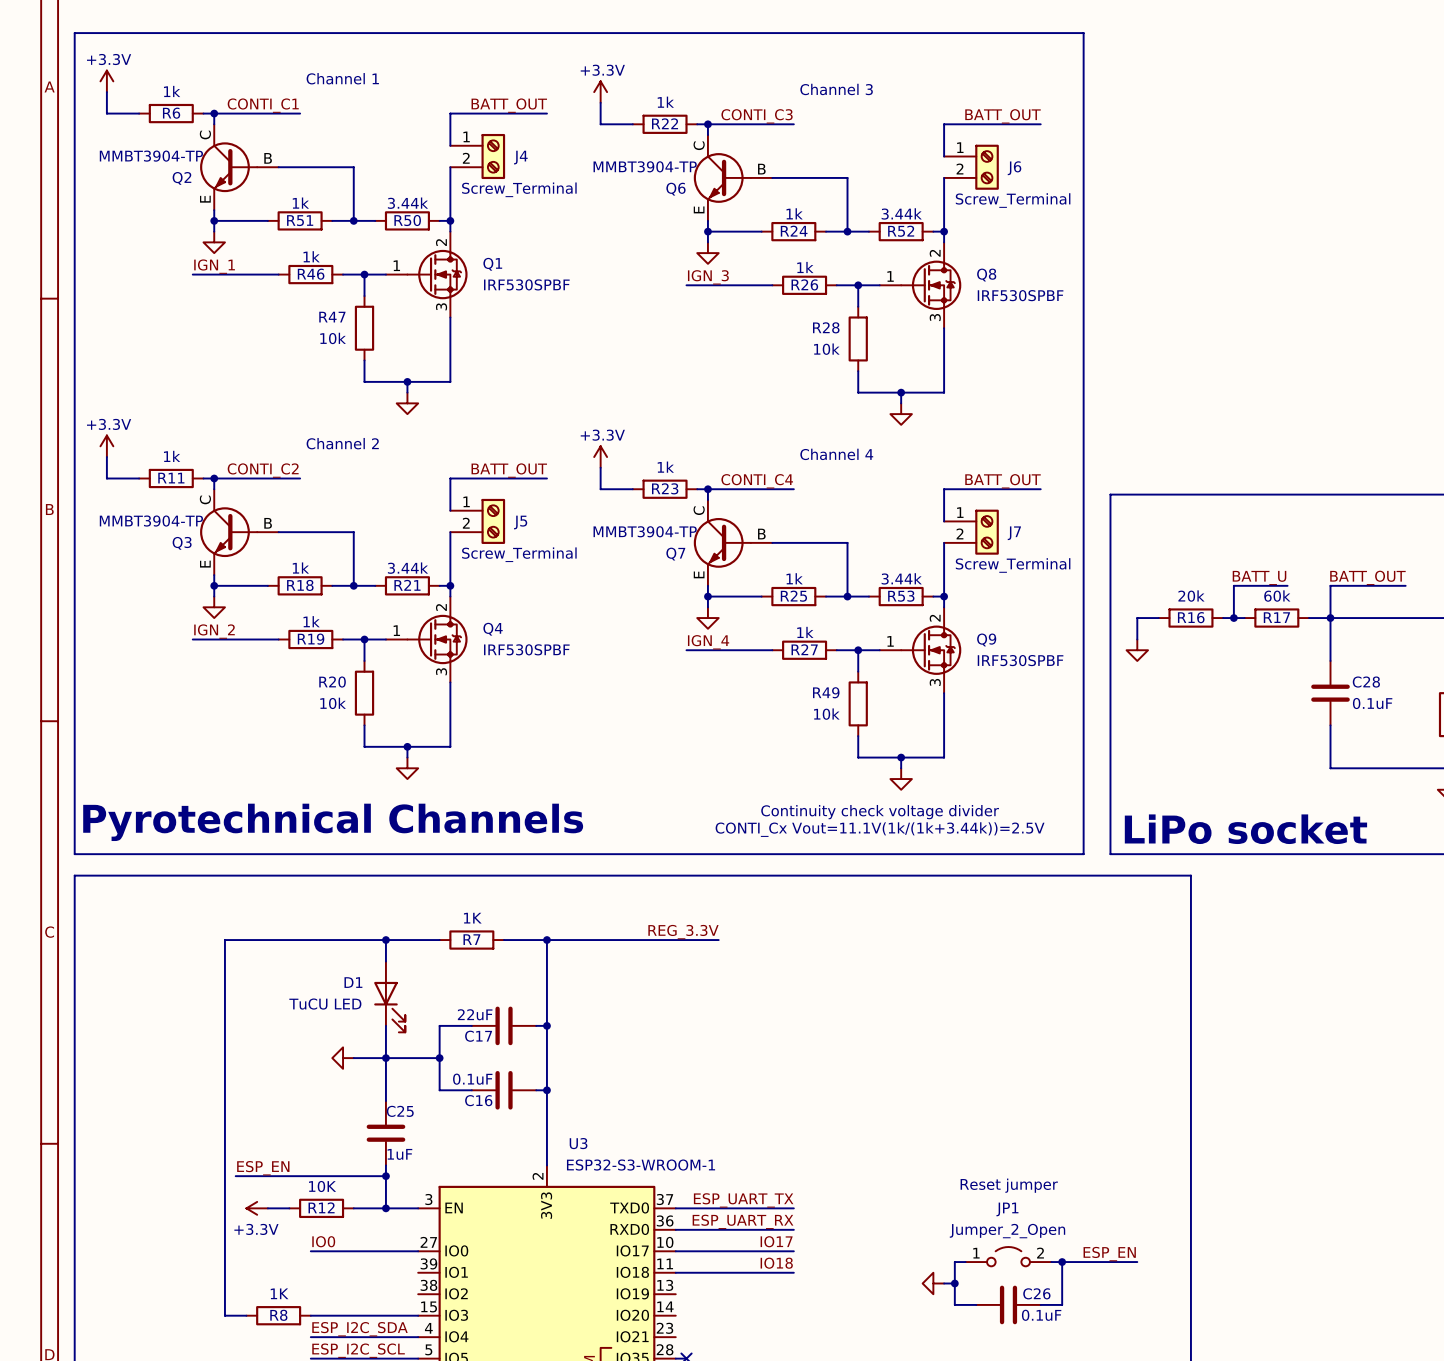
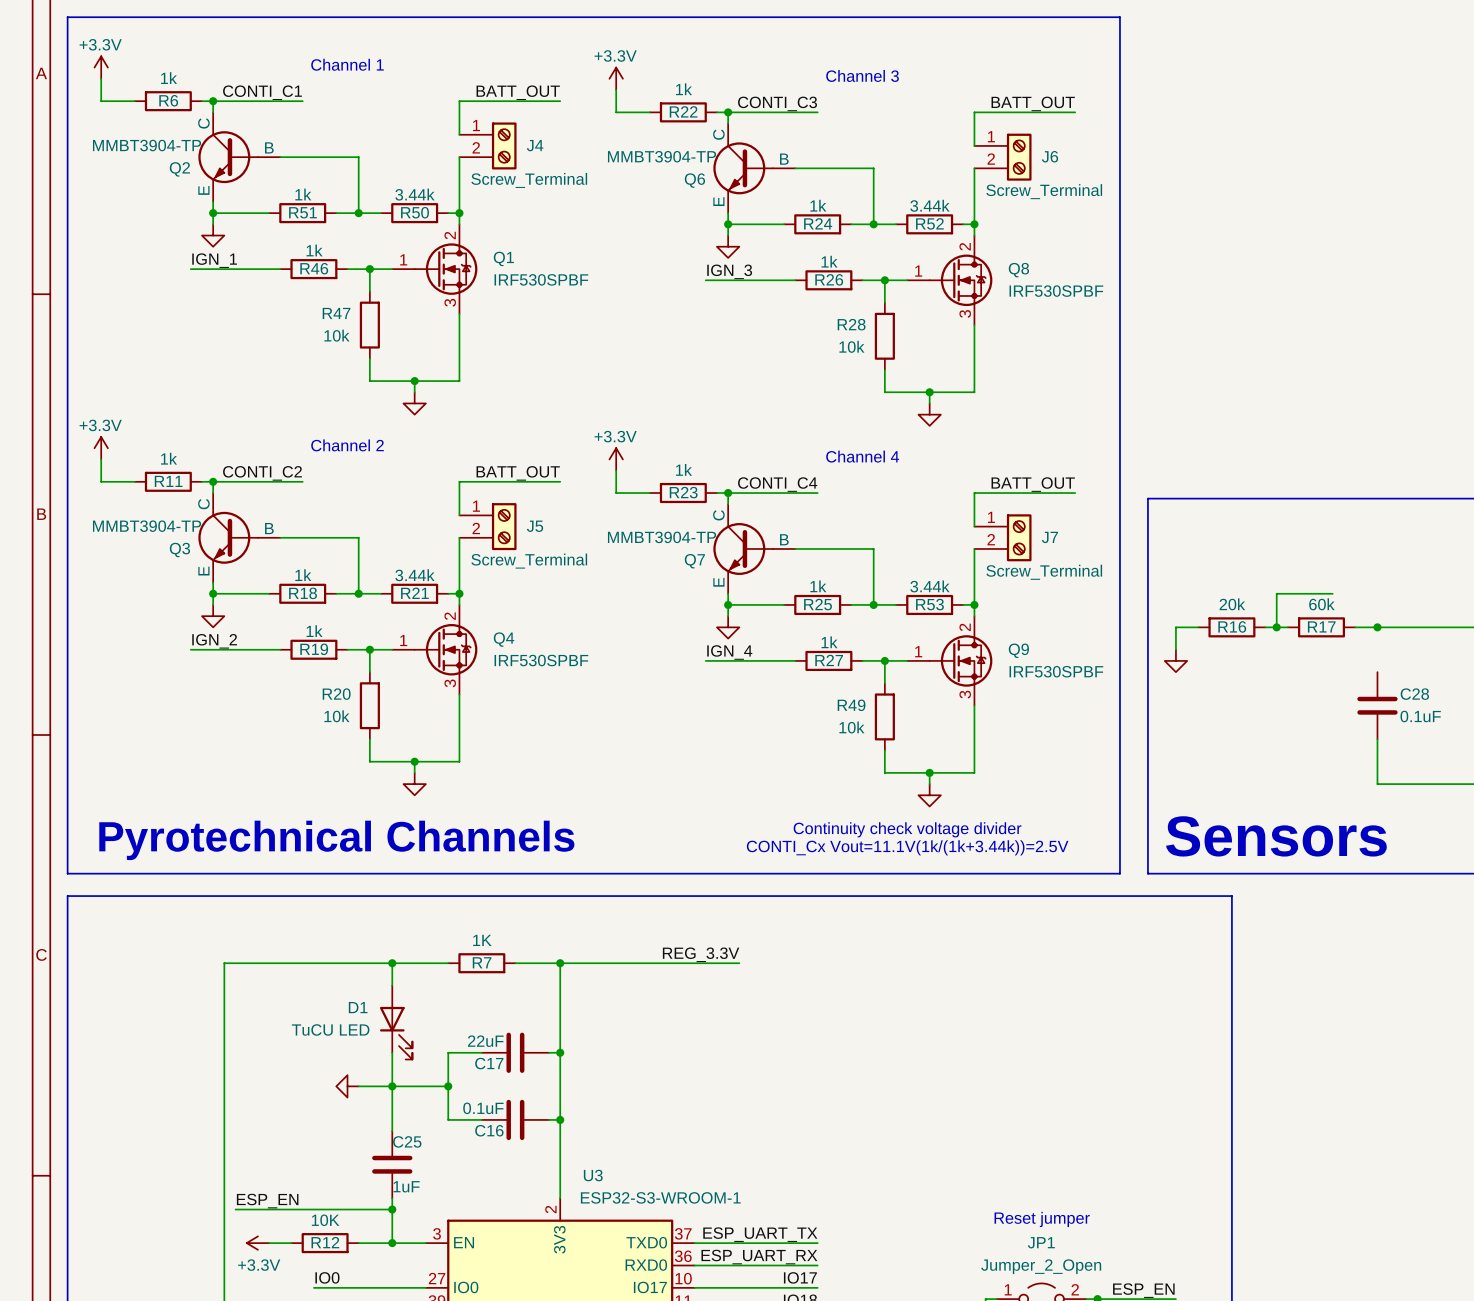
label: BATT_U (1259, 577) -> none
label: BATT_OUT (1367, 577) -> none
wire: (1405, 585) (1330, 585) (1330, 660) -> none
text: none -> Sensors (1276, 836)
text: LiPo socket (1245, 829) -> none

